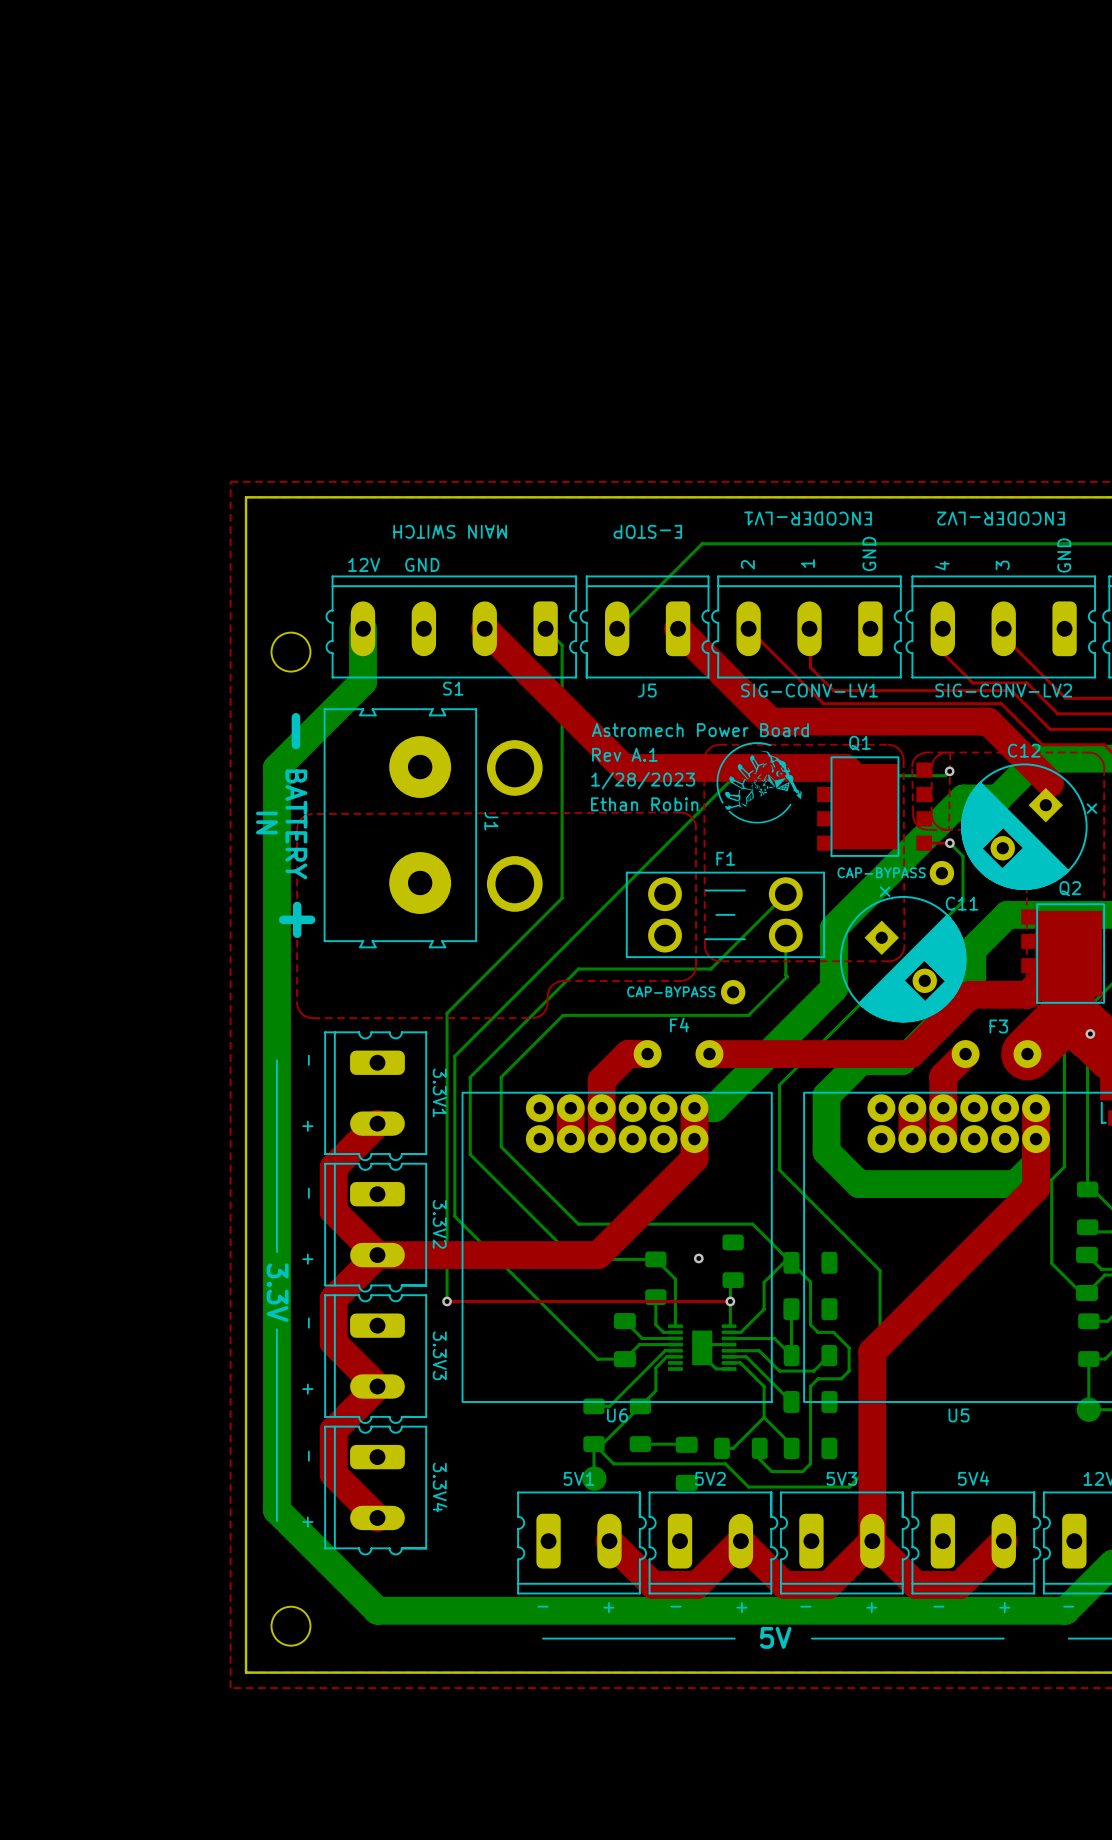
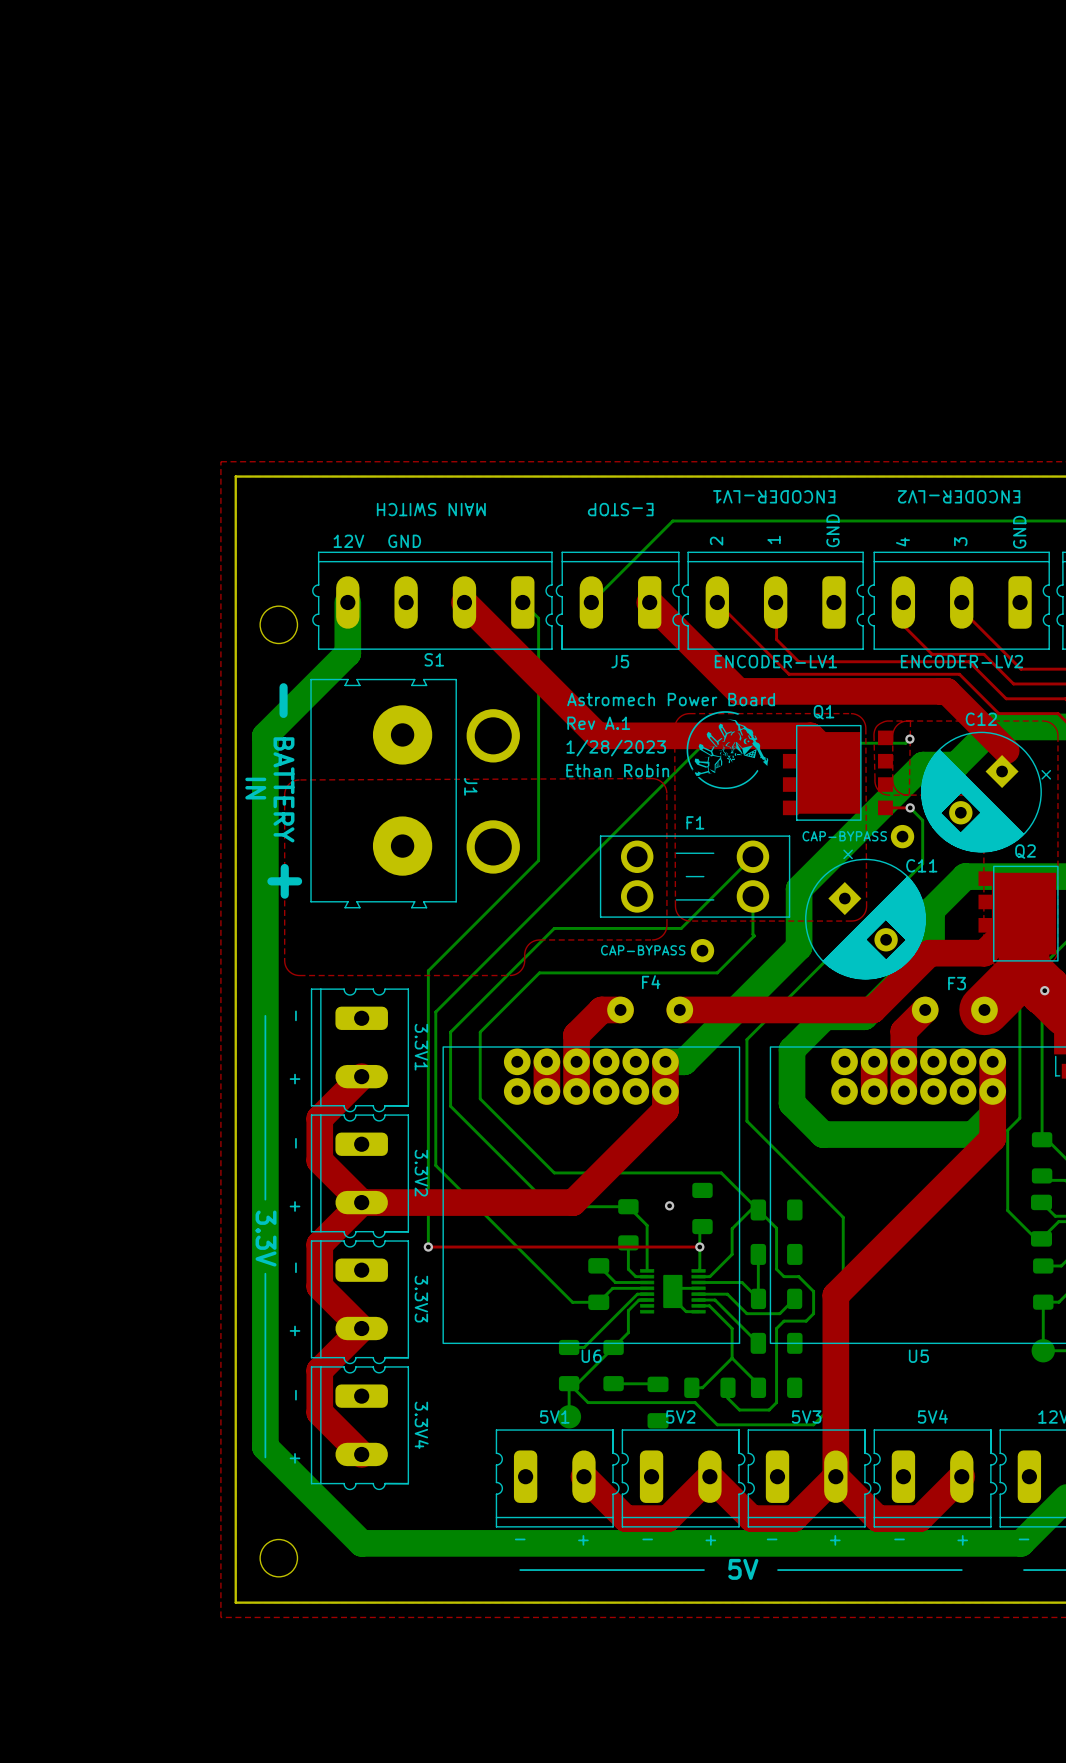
SIG-CONV-LV1 name: SIG-CONV-LV1 (809, 690) -> ENCODER-LV1 (775, 661)
SIG-CONV-LV2 name: SIG-CONV-LV2 (1003, 690) -> ENCODER-LV2 (961, 661)

